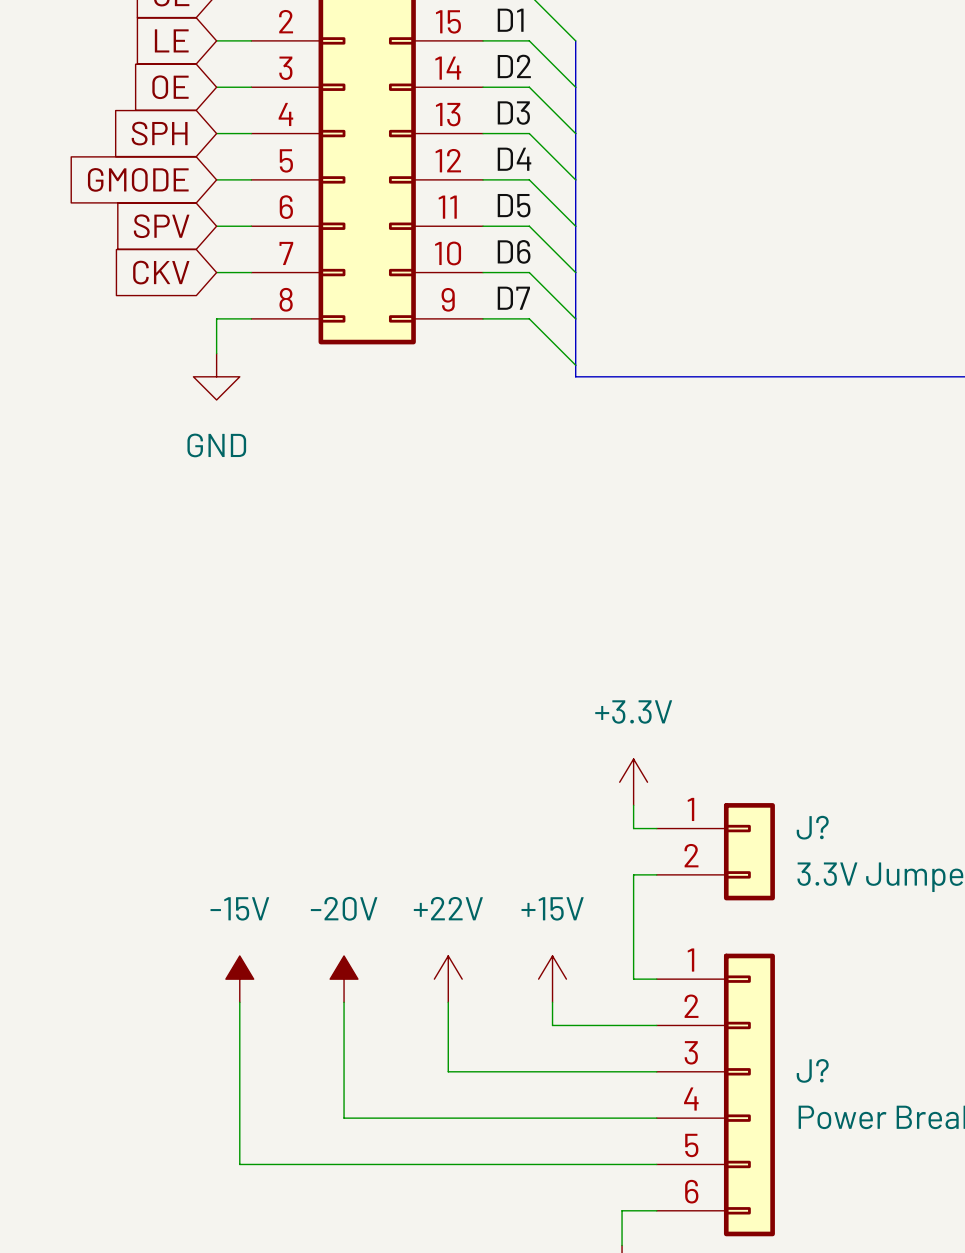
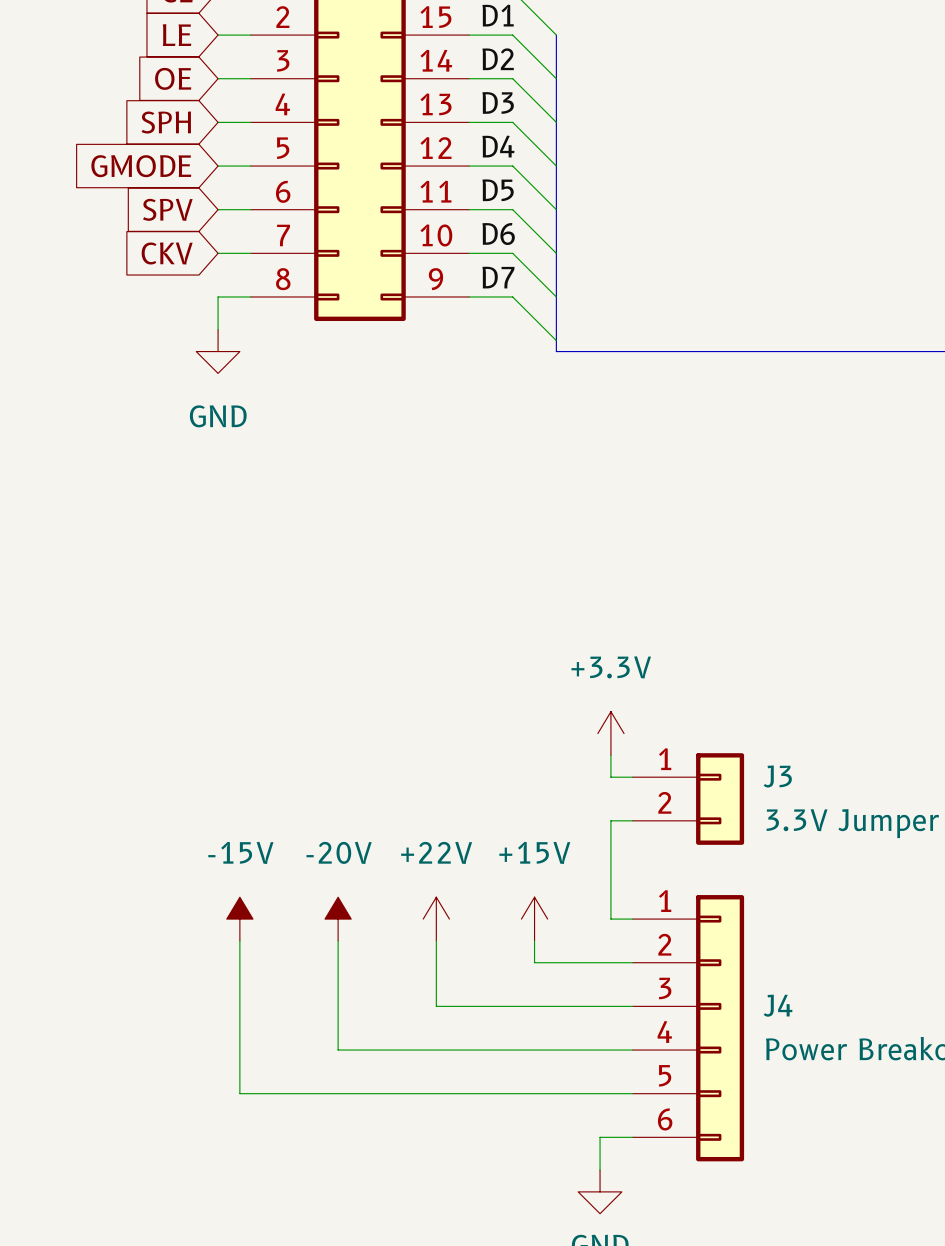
J? name: J? (812, 827) -> J3 (777, 776)
J? name: J? (812, 1070) -> J4 (778, 1005)

